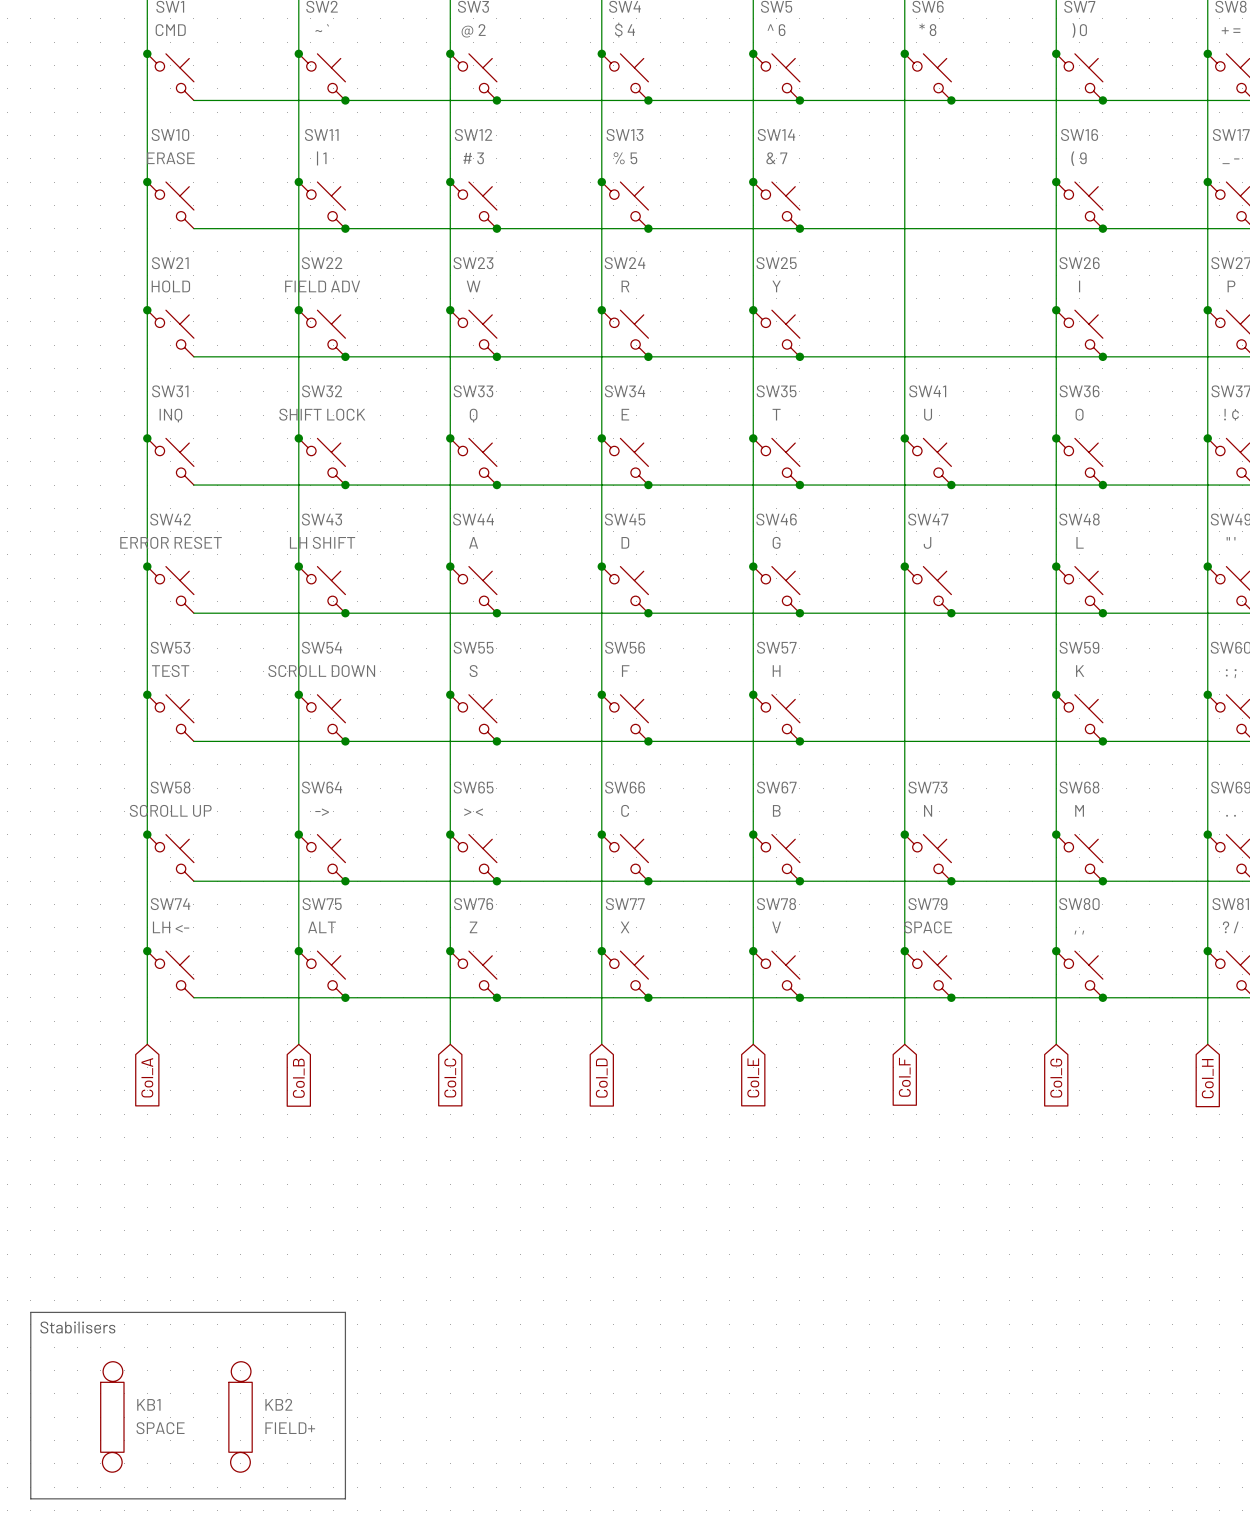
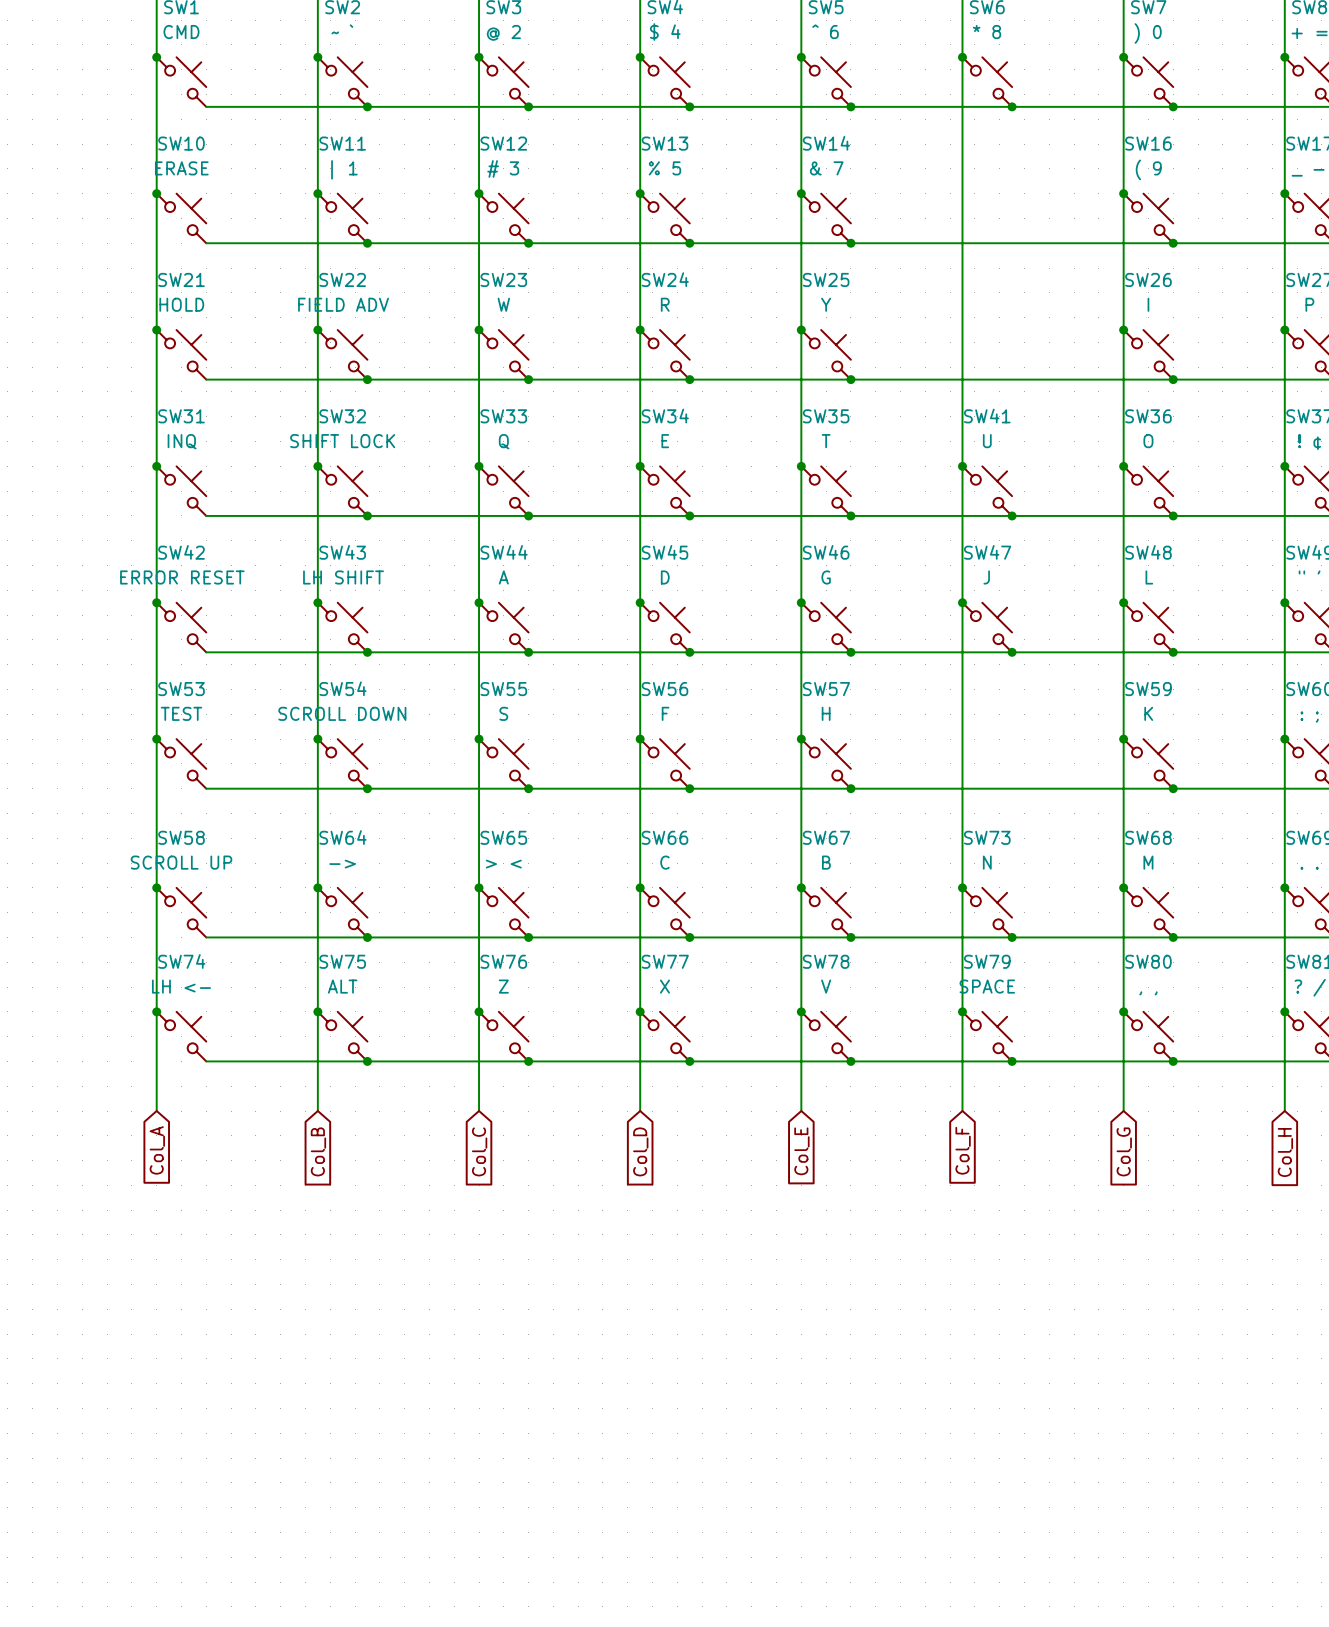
line: (30, 1312) (345, 1312) (345, 1498) (30, 1498) (30, 1312) -> none
text: Stabilisers (77, 1327) -> none
KB1: SPACE (112, 1416) -> none
KB2: FIELD+ (240, 1416) -> none

